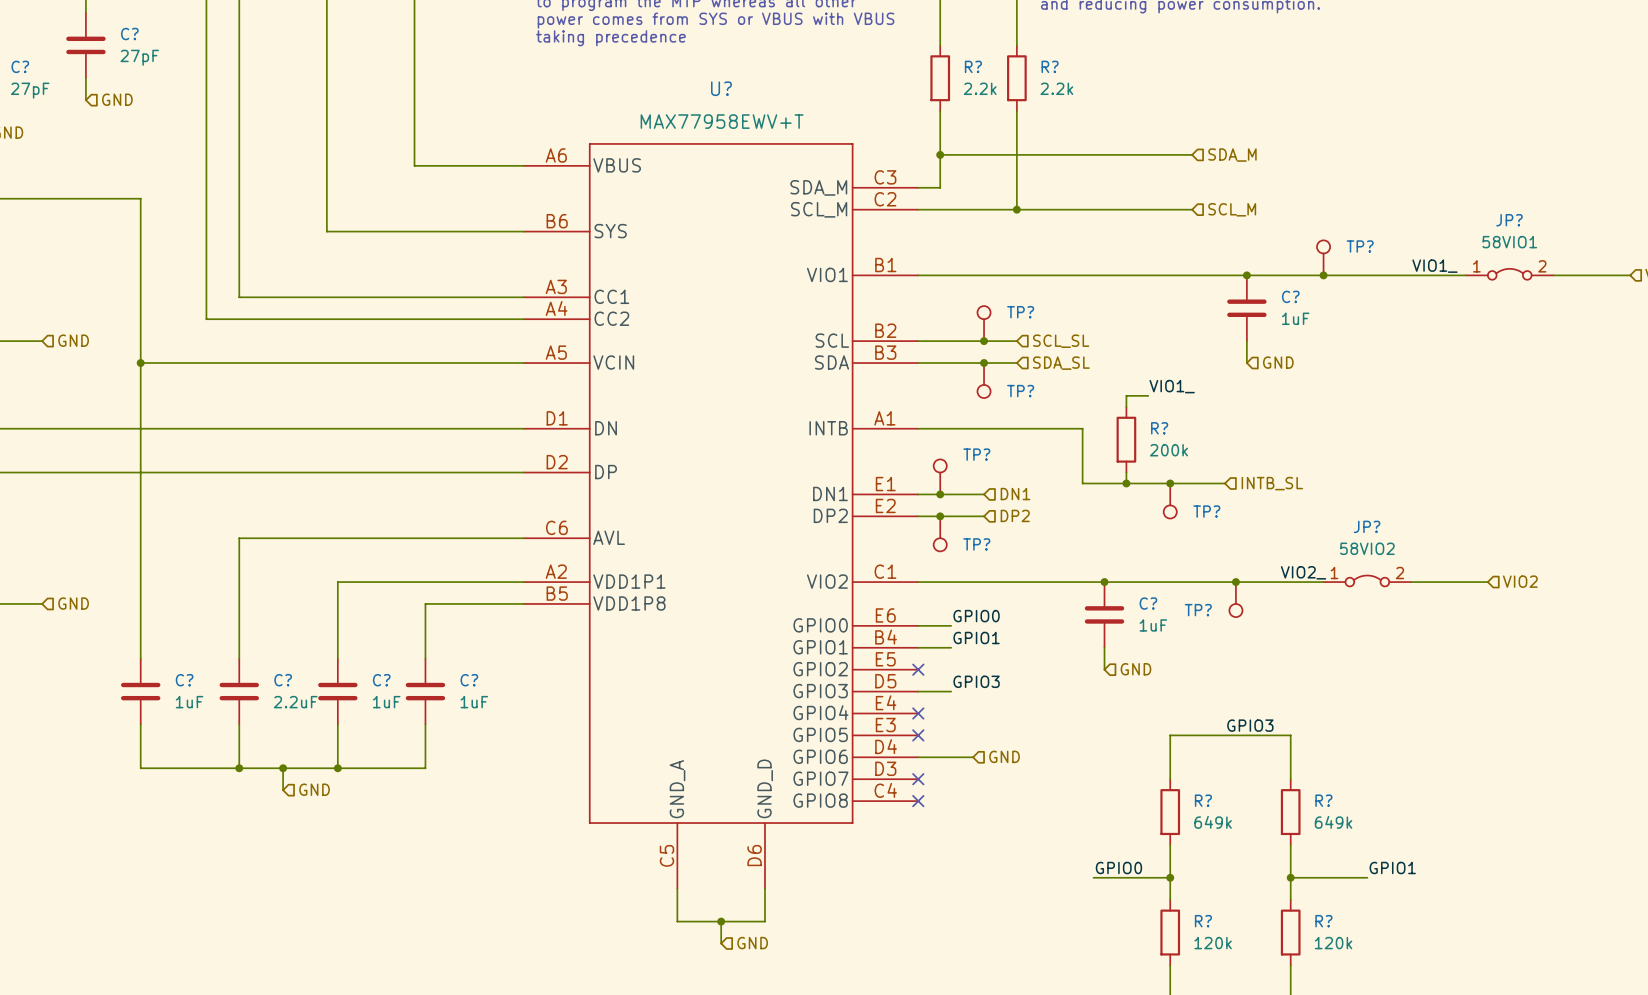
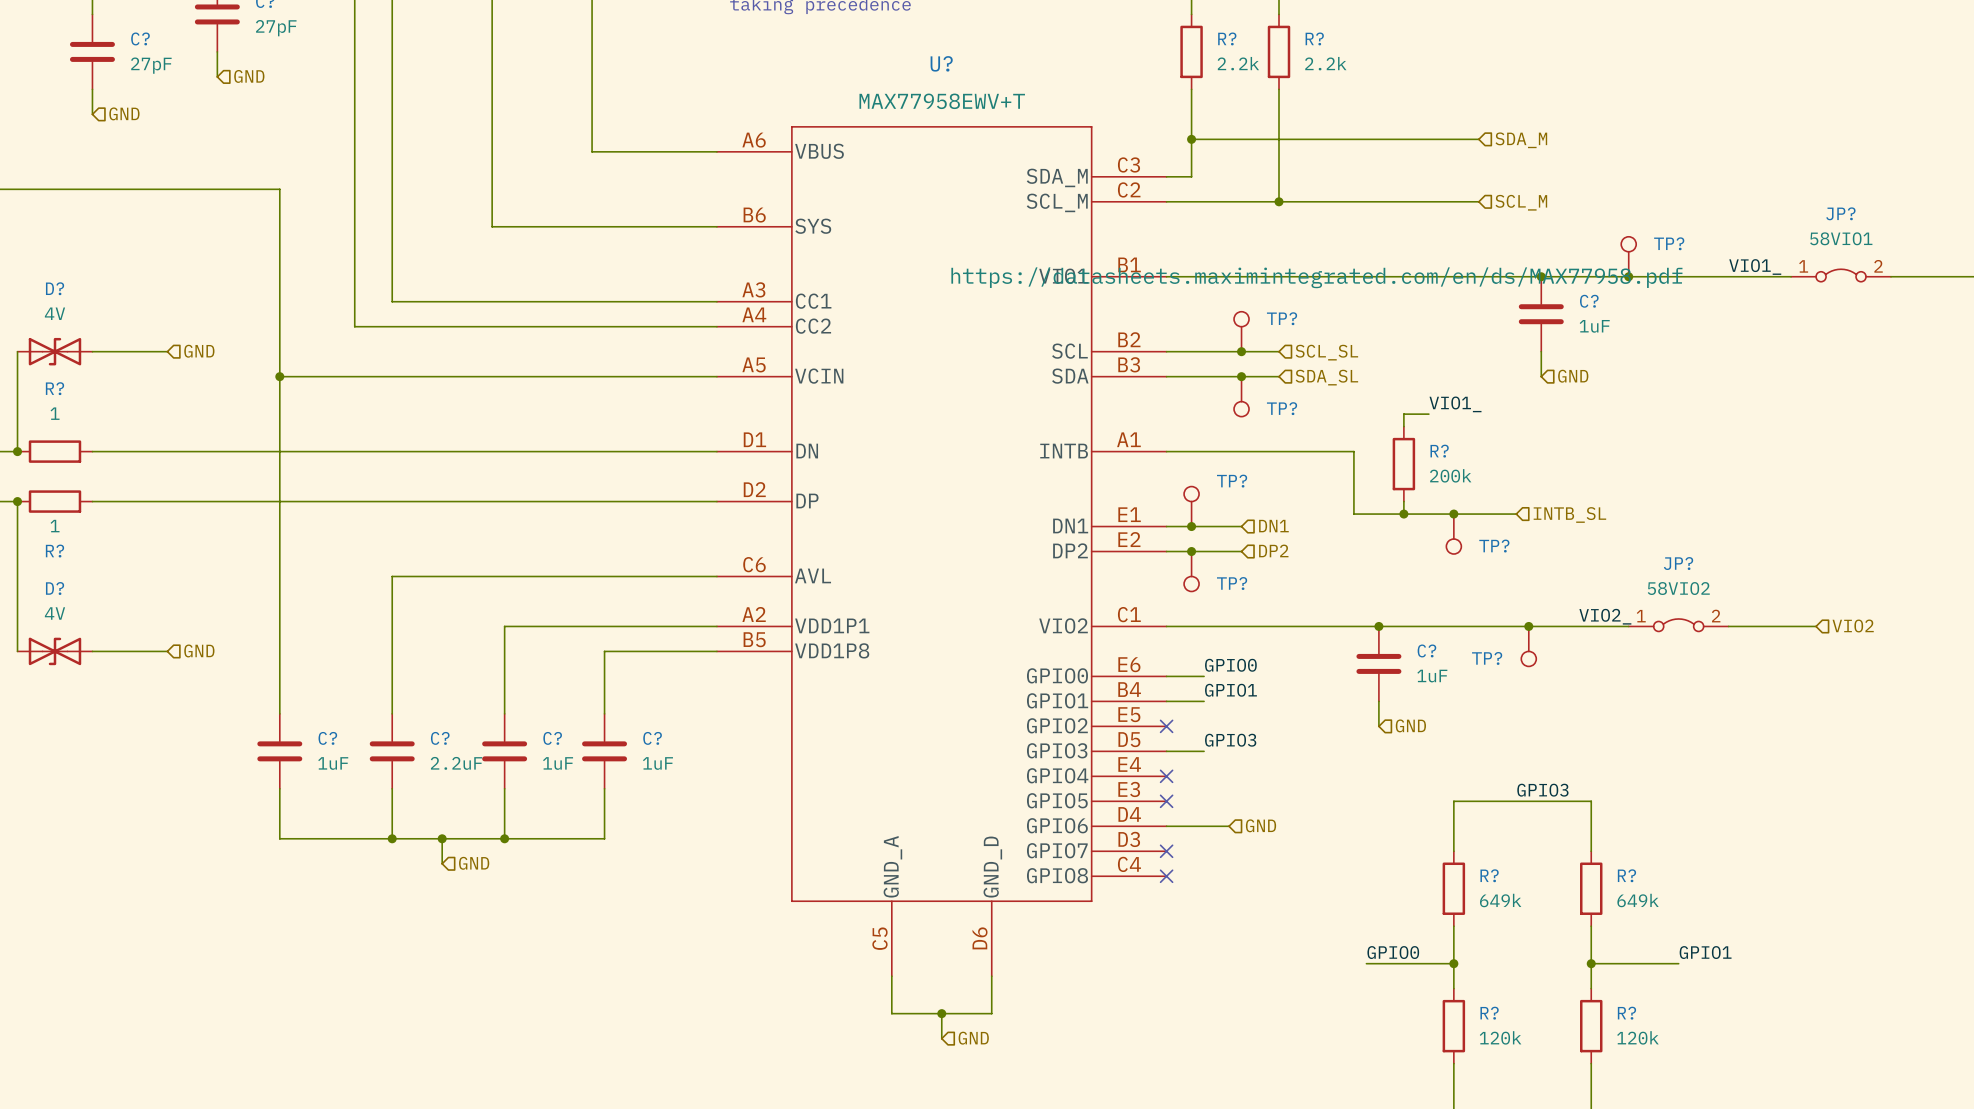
U? text: none -> https://datasheets.maximintegrated.com/en/ds/MAX77958.pdf (1316, 277)

